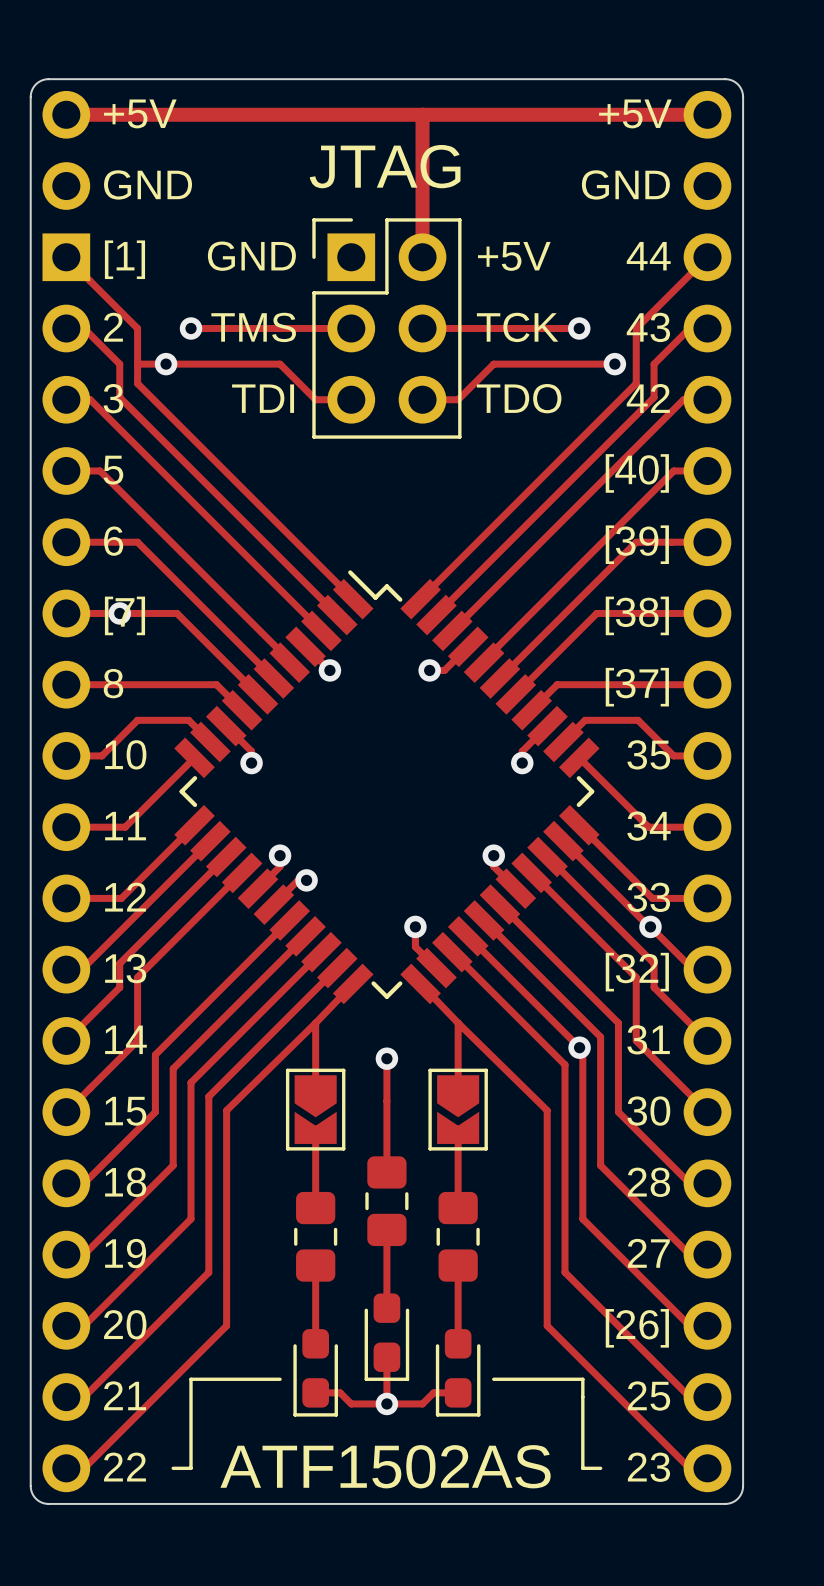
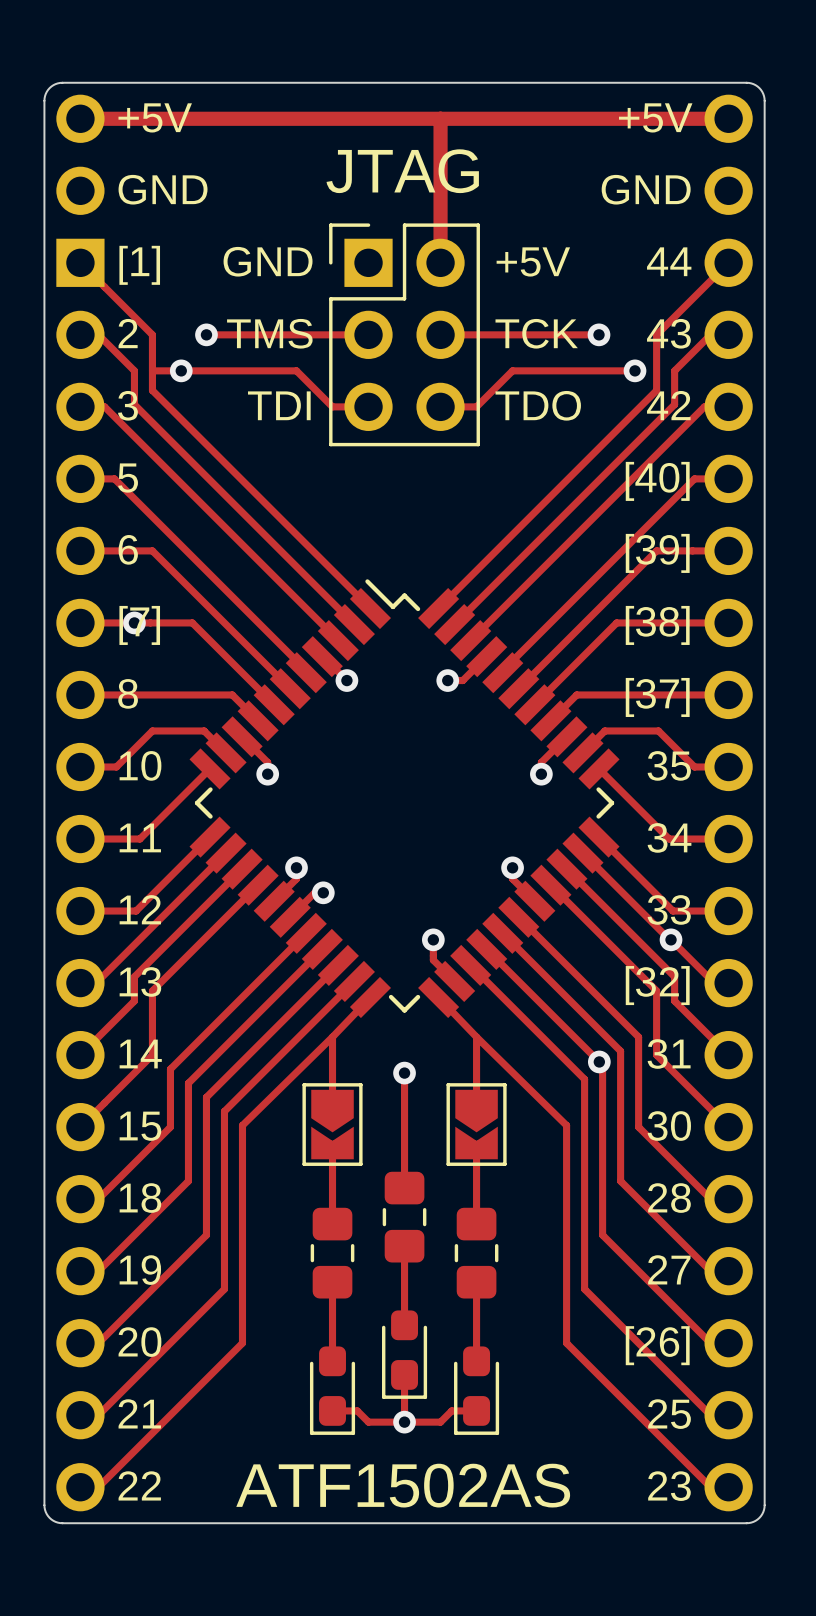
line: (280, 1379) (191, 1379) (191, 1468) (173, 1468) -> none
line: (493, 1379) (582, 1379) (582, 1468) (600, 1468) -> none

